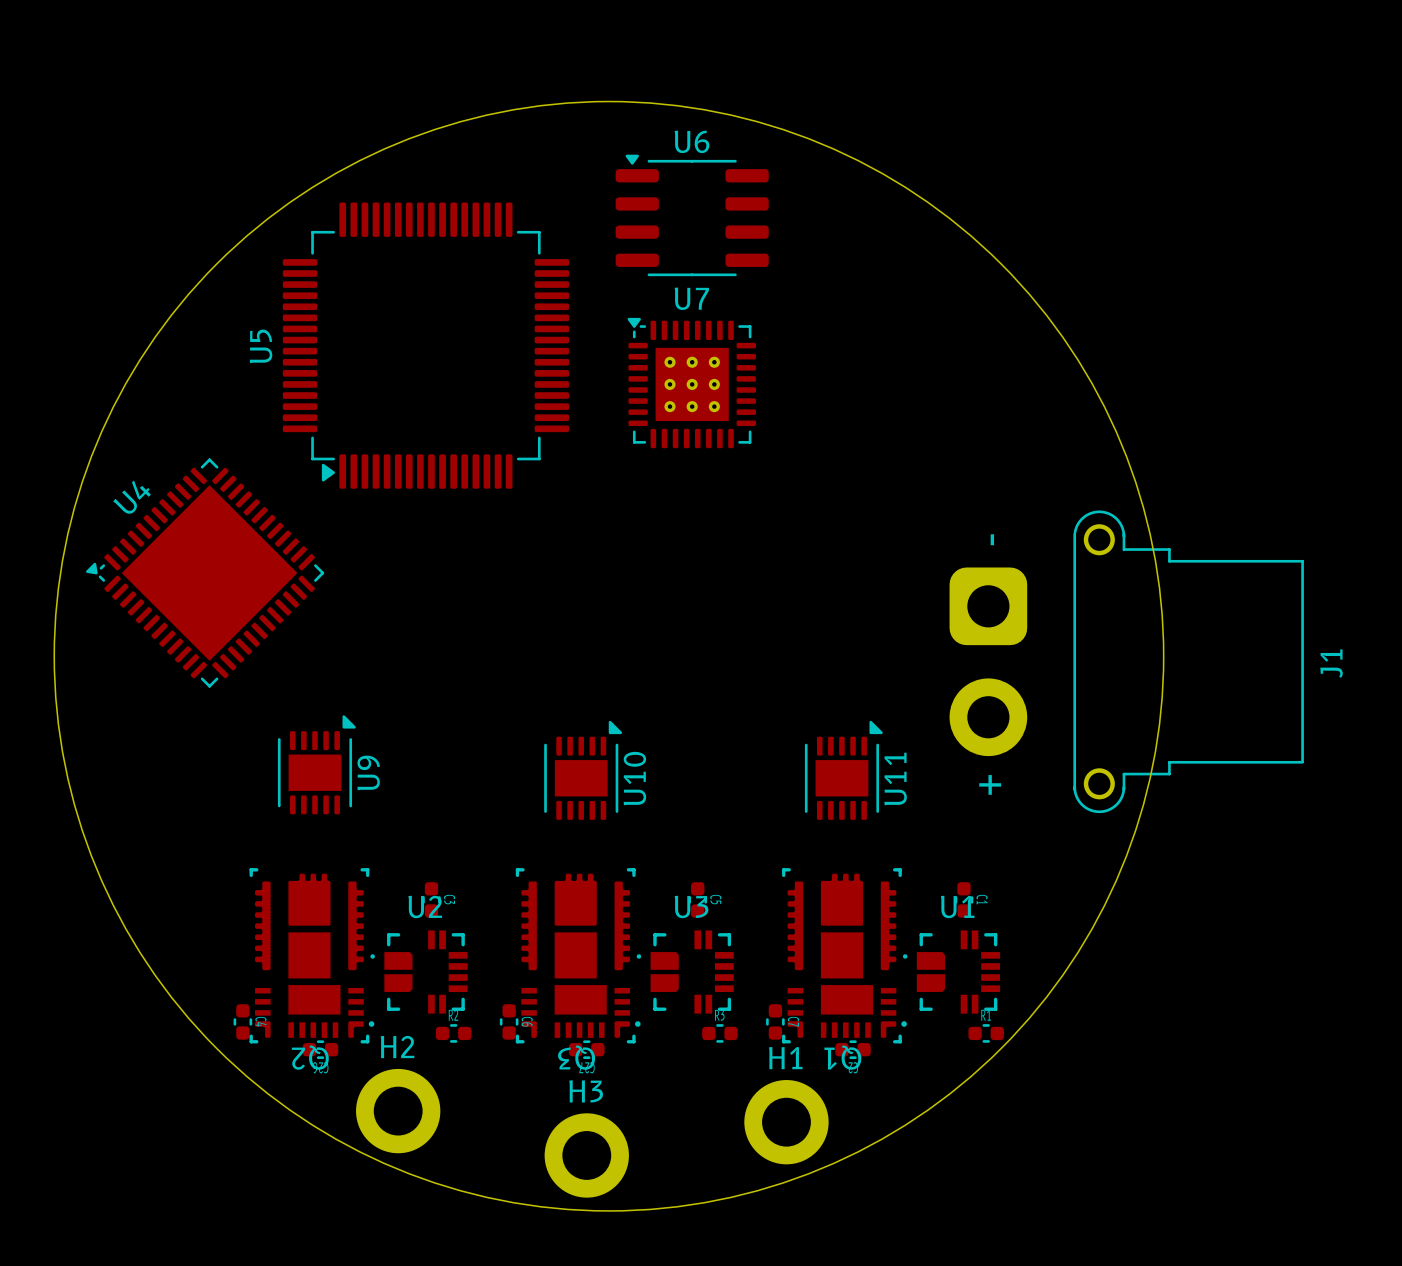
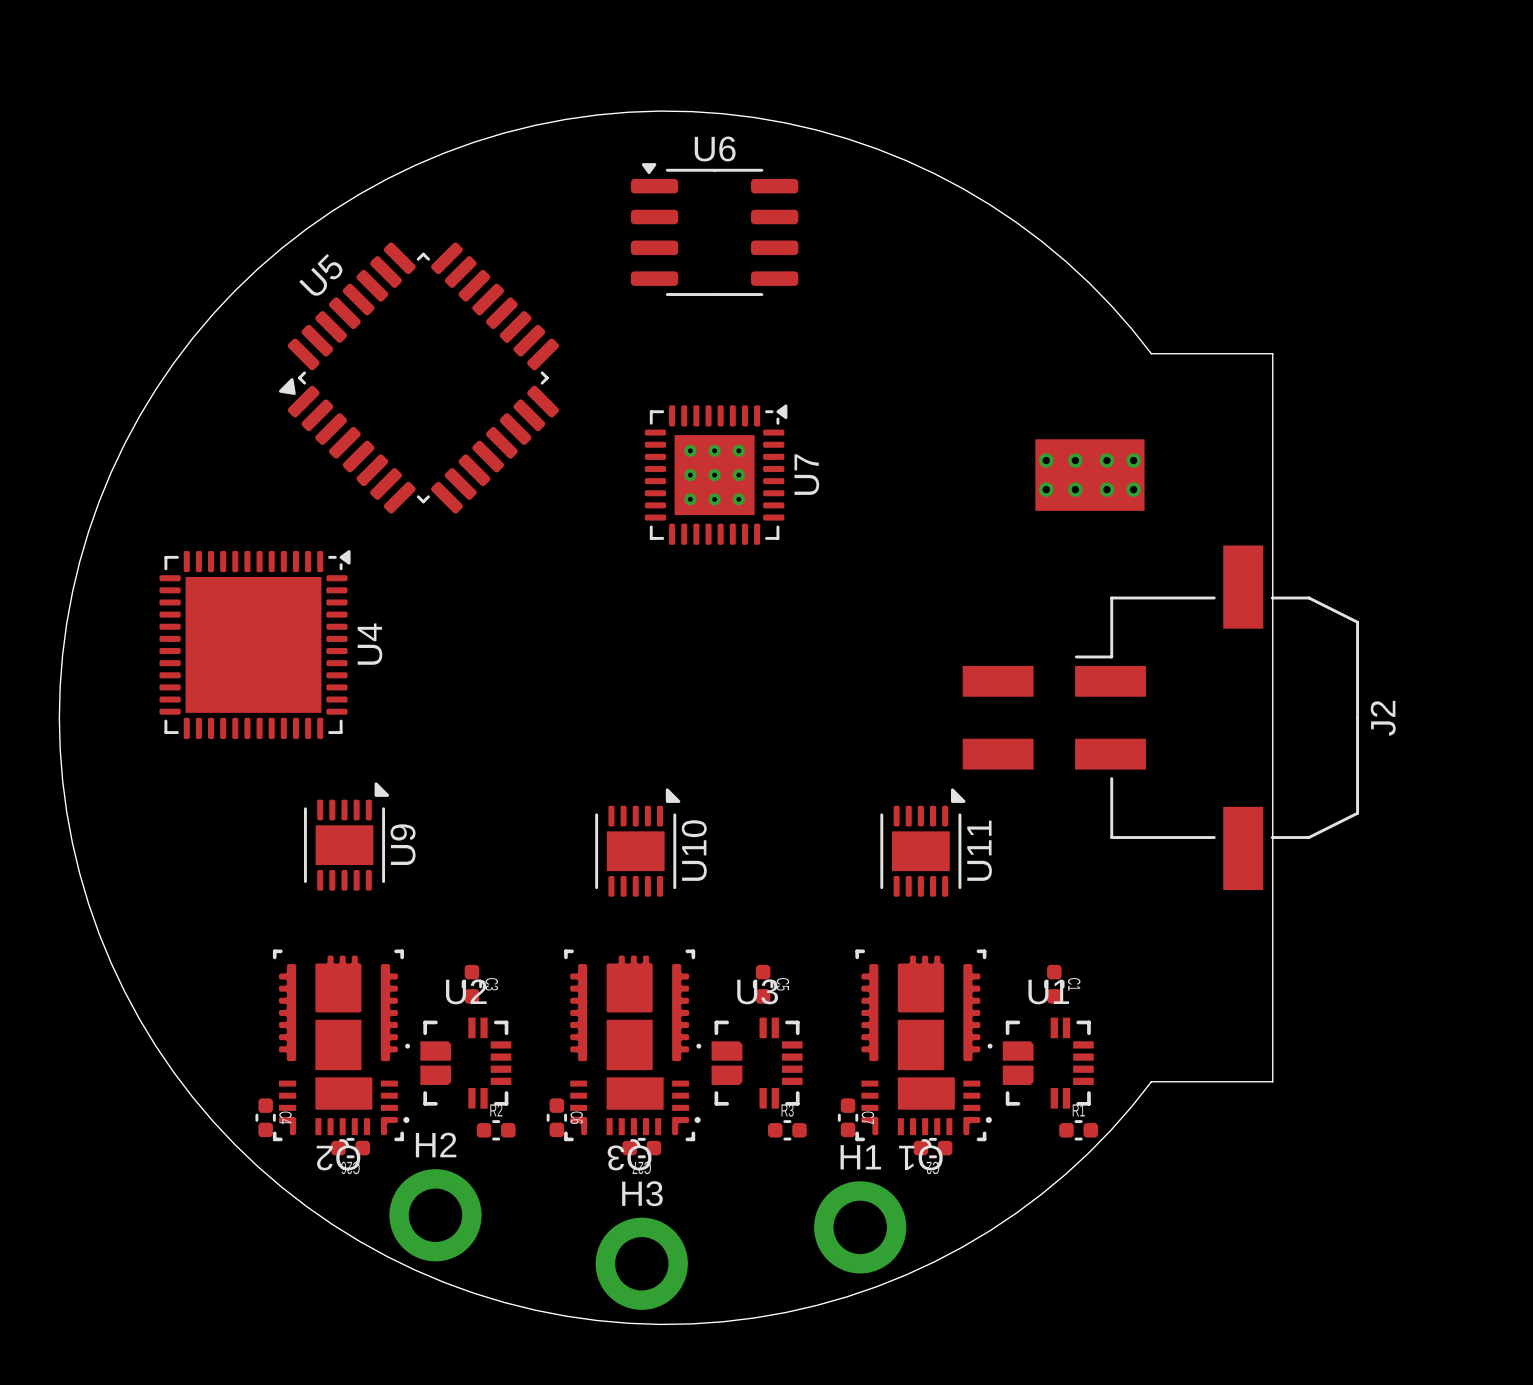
round board edge: [53, 100, 1165, 1212] -> none
U5 footprint: [282, 202, 570, 489] -> [278, 242, 559, 514]
U6 position: (692, 215) -> (714, 229)
board edge: none -> (1151, 353) (1272, 353) (1272, 1081) (1151, 1081) (1110, 1130) (1065, 1174) (1016, 1213) (989, 1230) (934, 1261) (876, 1286) (846, 1296) (785, 1312) (723, 1321) (660, 1324) (628, 1323) (566, 1316) (504, 1302) (444, 1282) (387, 1256) (332, 1224) (281, 1187) (235, 1144) (193, 1097) (173, 1072) (139, 1019) (124, 991) (99, 933) (79, 873) (66, 812) (60, 749) (60, 686) (66, 623) (79, 561) (99, 501) (124, 443) (156, 389) (193, 337) (235, 290) (257, 268) (306, 228) (359, 194) (415, 165) (474, 142) (535, 125) (597, 114) (660, 111) (691, 111) (754, 117) (816, 130) (876, 148) (906, 160) (962, 188) (1016, 222) (1065, 261) (1110, 305) (1131, 328) (1151, 353)
U5 name position: U5 (261, 346) -> U5 (320, 275)
U7 rotation: 0° (691, 383) -> 90° clockwise (716, 474)
part: none -> (1089, 475)
U4 rotation: 0° (205, 573) -> 135° clockwise (255, 644)
J2: none -> (1160, 717)
J1: (1126, 661) -> none

